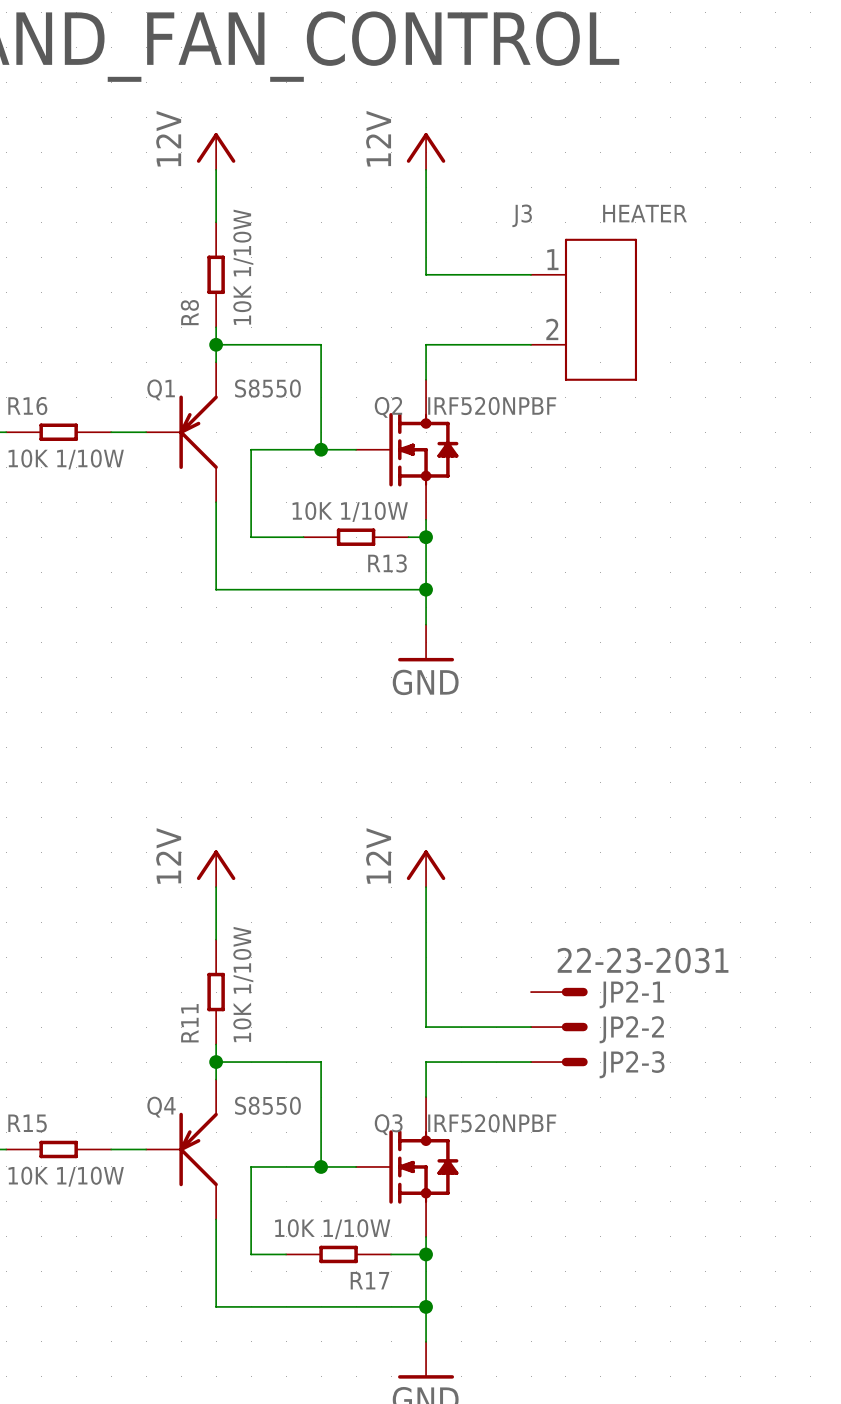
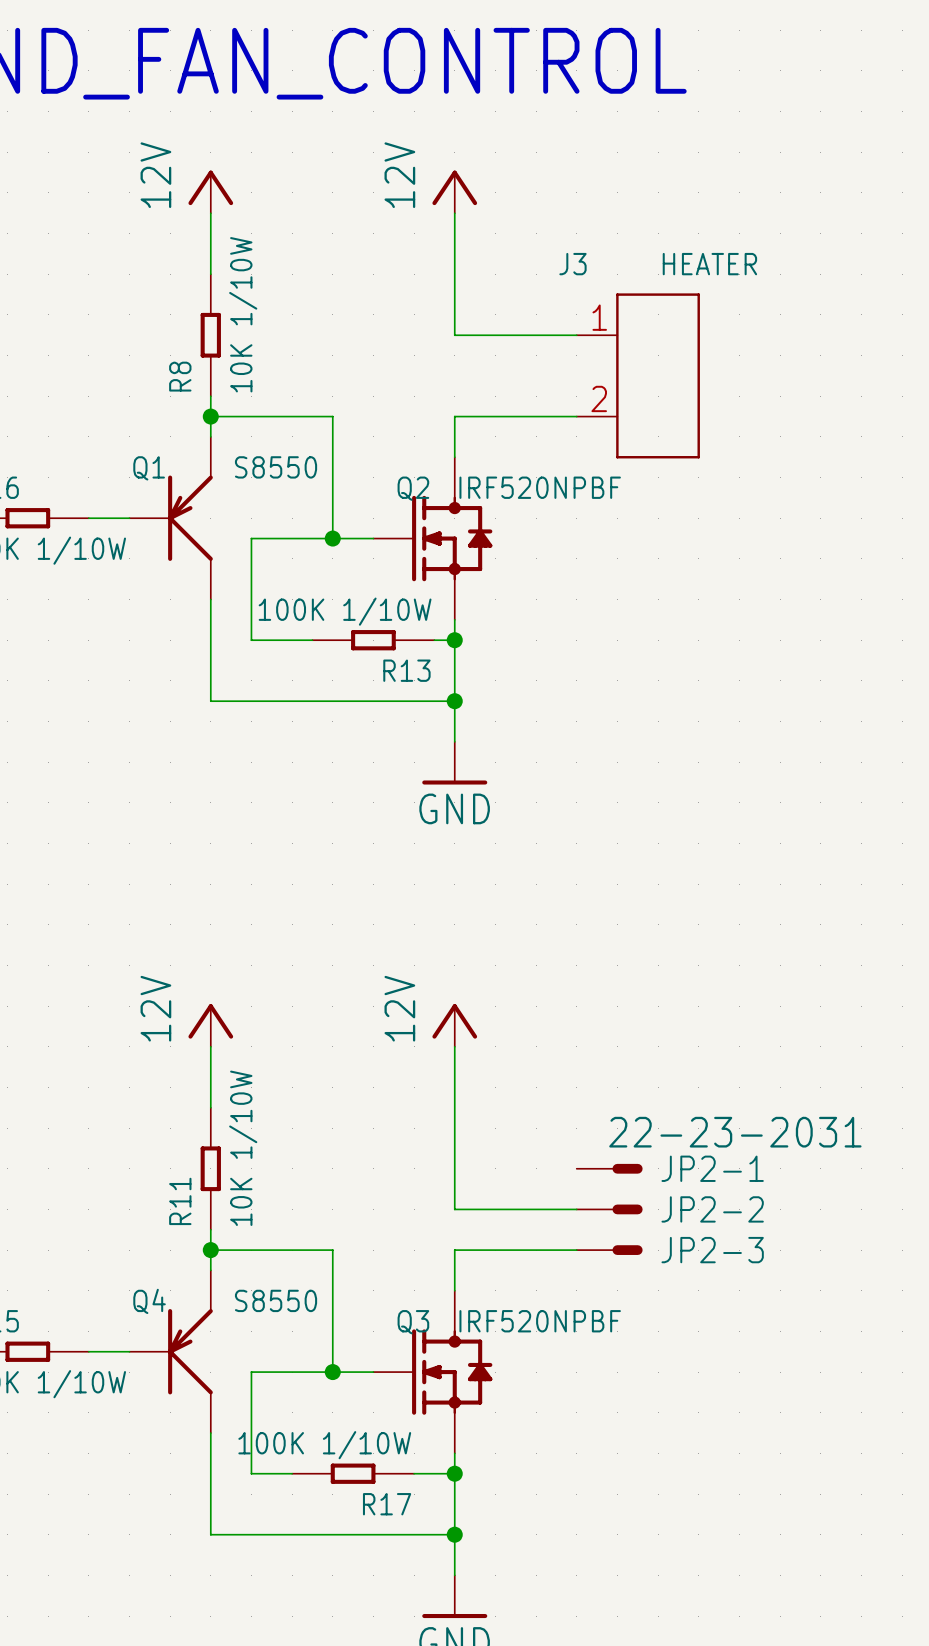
R13 value: 10K 1/10W (350, 511) -> 100K 1/10W (345, 611)
R17 value: 10K 1/10W (332, 1229) -> 100K 1/10W (324, 1445)

